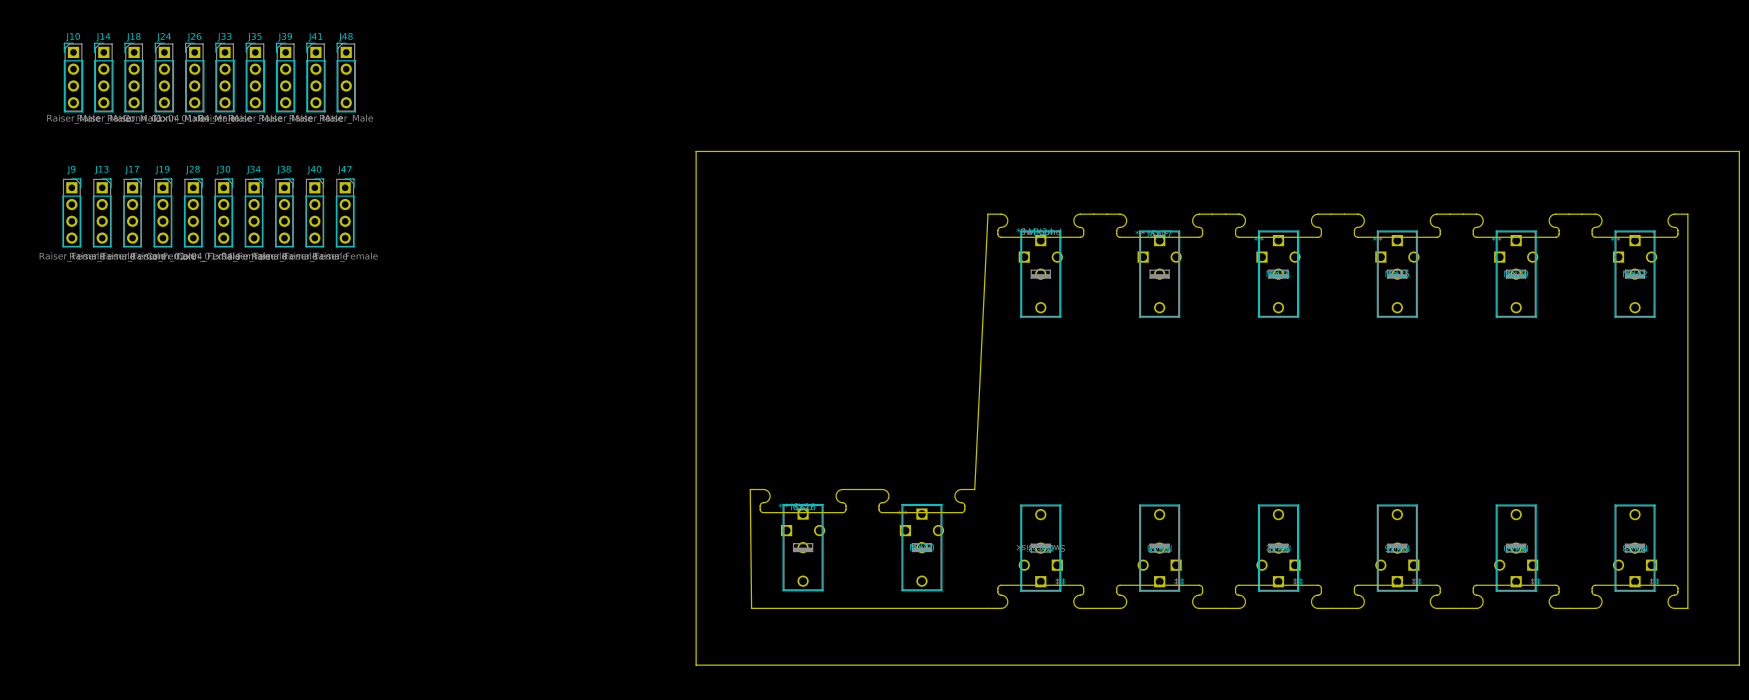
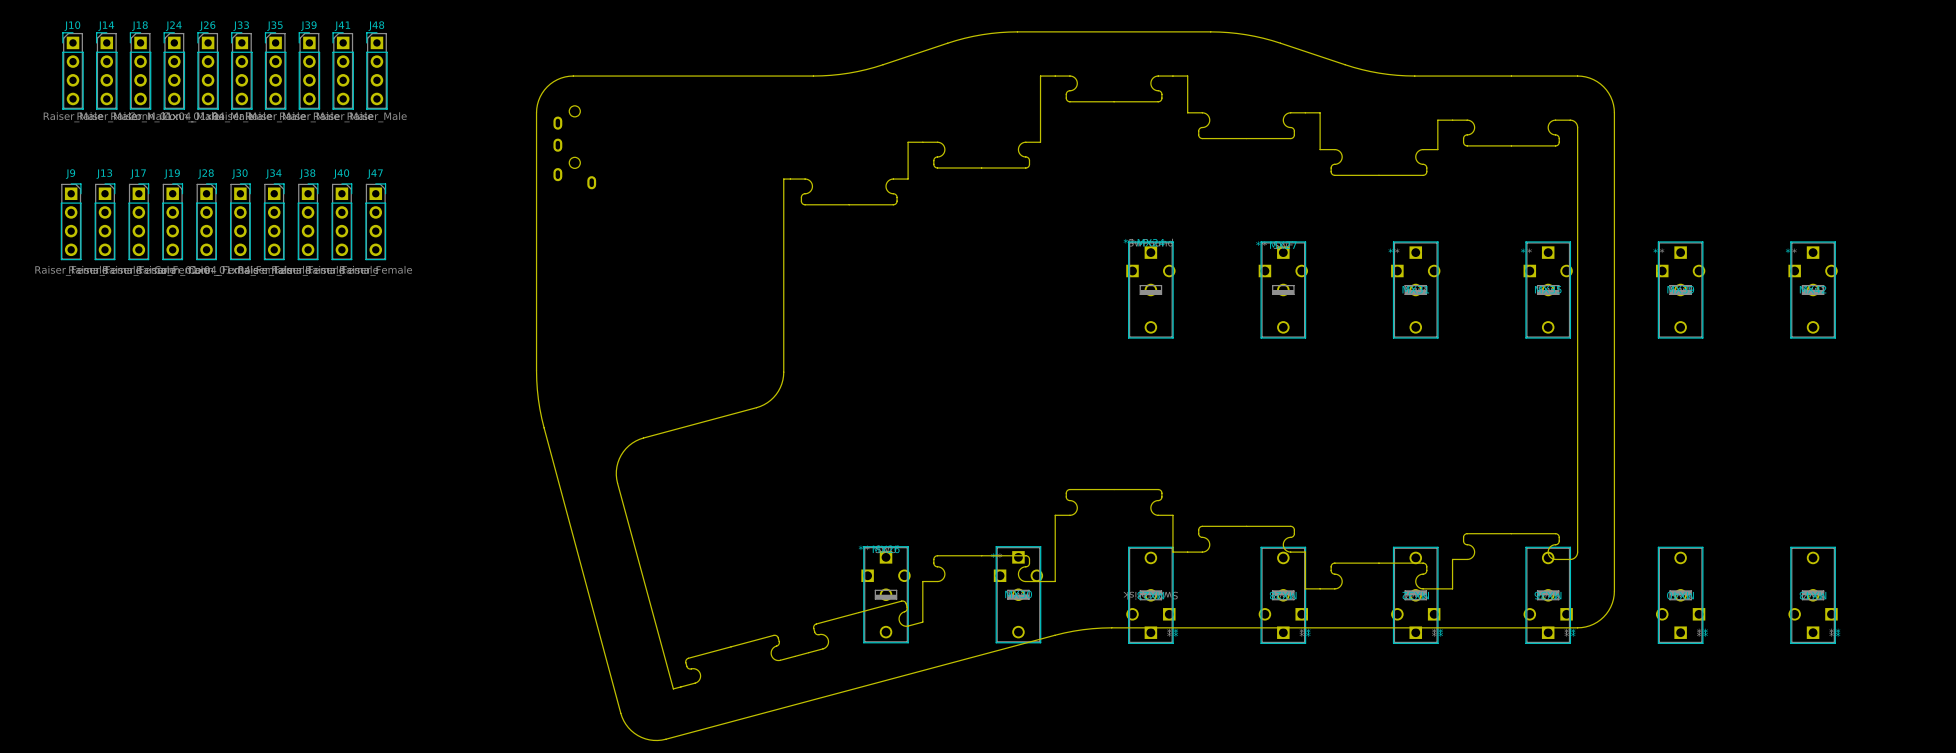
part: none -> (574, 147)
board edge: (696, 151) (1739, 151) (1739, 665) (696, 665) (696, 151) -> (1017, 31) (990, 33) (964, 38) (874, 67) (839, 74) (569, 76) (553, 81) (540, 96) (536, 112) (536, 370) (538, 399) (544, 427) (620, 713) (631, 730) (645, 738) (665, 739) (1054, 635) (1083, 629) (1111, 627) (1577, 627) (1593, 624) (1603, 617) (1612, 603) (1614, 591) (1614, 112) (1612, 100) (1603, 86) (1593, 79) (1581, 76) (1414, 76) (1379, 73) (1353, 67) (1272, 40) (1228, 32) (1017, 31)
board edge: (882, 512) (879, 510) (879, 504) (886, 501) (888, 496) (887, 491) (883, 489) (839, 490) (836, 496) (838, 501) (845, 504) (845, 510) (843, 512) (763, 512) (760, 510) (760, 505) (768, 499) (769, 493) (765, 489) (750, 489) (751, 608) (1001, 608) (1006, 606) (1007, 601) (1005, 596) (998, 593) (998, 587) (1001, 585) (1081, 585) (1083, 587) (1083, 593) (1076, 596) (1073, 601) (1076, 606) (1080, 608) (1123, 607) (1126, 604) (1126, 599) (1116, 592) (1116, 587) (1120, 585) (1200, 585) (1202, 587) (1202, 593) (1194, 596) (1192, 601) (1194, 606) (1199, 608) (1241, 607) (1245, 600) (1243, 596) (1235, 593) (1235, 587) (1238, 585) (1318, 585) (1321, 587) (1321, 593) (1313, 597) (1311, 601) (1313, 606) (1318, 608) (1361, 607) (1363, 604) (1363, 599) (1354, 592) (1354, 587) (1357, 585) (1437, 585) (1440, 587) (1440, 593) (1432, 597) (1430, 601) (1432, 606) (1436, 608) (1479, 607) (1483, 600) (1480, 596) (1473, 593) (1473, 587) (1476, 585) (1556, 585) (1558, 587) (1558, 593) (1551, 596) (1549, 600) (1552, 607) (1595, 608) (1600, 606) (1602, 601) (1600, 597) (1592, 593) (1592, 587) (1594, 585) (1674, 585) (1677, 587) (1677, 592) (1669, 598) (1668, 604) (1673, 608) (1687, 608) (1687, 214) (1673, 214) (1668, 217) (1669, 224) (1677, 229) (1677, 235) (1674, 237) (1594, 237) (1592, 234) (1592, 229) (1600, 225) (1602, 220) (1600, 216) (1595, 214) (1552, 215) (1549, 219) (1549, 223) (1559, 230) (1558, 235) (1555, 237) (1475, 237) (1473, 234) (1473, 229) (1481, 225) (1483, 220) (1481, 216) (1476, 214) (1433, 215) (1430, 219) (1430, 223) (1440, 230) (1440, 235) (1436, 237) (1356, 237) (1354, 234) (1354, 229) (1362, 225) (1364, 220) (1362, 216) (1357, 214) (1314, 215) (1311, 219) (1312, 223) (1321, 230) (1321, 235) (1318, 237) (1238, 237) (1235, 234) (1235, 229) (1243, 225) (1245, 220) (1243, 216) (1238, 214) (1195, 215) (1192, 221) (1195, 226) (1202, 229) (1202, 234) (1199, 237) (1119, 237) (1116, 234) (1116, 229) (1124, 226) (1126, 221) (1123, 215) (1080, 214) (1075, 216) (1073, 220) (1075, 225) (1083, 229) (1083, 234) (1081, 237) (1001, 237) (998, 235) (997, 229) (1006, 224) (1006, 217) (1002, 214) (987, 214) (974, 489) (960, 489) (955, 492) (956, 500) (964, 504) (963, 512) (928, 512) -> (974, 555) (934, 557) (934, 564) (943, 569) (944, 575) (939, 581) (922, 581) (922, 622) (907, 626) (901, 624) (899, 616) (907, 608) (905, 602) (901, 601) (815, 624) (813, 627) (815, 633) (824, 635) (828, 639) (827, 645) (823, 648) (776, 660) (771, 654) (772, 649) (779, 643) (777, 637) (774, 635) (688, 658) (685, 661) (687, 667) (698, 670) (700, 678) (696, 682) (673, 688) (617, 483) (616, 466) (623, 451) (635, 441) (760, 406) (770, 400) (778, 391) (783, 372) (783, 179) (806, 179) (810, 181) (811, 190) (801, 196) (801, 202) (804, 204) (894, 204) (896, 202) (896, 196) (888, 191) (886, 184) (891, 179) (908, 179) (908, 142) (937, 142) (942, 144) (944, 148) (943, 153) (933, 159) (933, 165) (936, 167) (1027, 167) (1029, 165) (1029, 159) (1020, 154) (1018, 148) (1023, 142) (1040, 142) (1040, 76) (1074, 77) (1077, 82) (1076, 87) (1066, 93) (1066, 99) (1069, 101) (1159, 101) (1161, 99) (1161, 93) (1151, 87) (1150, 82) (1153, 78) (1158, 76) (1187, 76) (1187, 112) (1204, 113) (1209, 118) (1207, 125) (1198, 129) (1198, 135) (1201, 138) (1291, 138) (1294, 135) (1294, 130) (1284, 123) (1283, 119) (1285, 114) (1290, 112) (1320, 112) (1320, 149) (1336, 149) (1341, 155) (1340, 162) (1331, 166) (1331, 172) (1334, 175) (1424, 174) (1426, 166) (1417, 162) (1416, 155) (1421, 149) (1437, 149) (1437, 120) (1471, 121) (1474, 126) (1473, 131) (1463, 138) (1463, 143) (1467, 145) (1556, 145) (1559, 143) (1559, 137) (1549, 131) (1549, 123) (1555, 120) (1571, 120) (1576, 122) (1577, 127) (1577, 552) (1574, 557) (1555, 559) (1549, 556) (1549, 548) (1559, 542) (1559, 536) (1556, 533) (1466, 533) (1463, 536) (1463, 542) (1472, 547) (1474, 553) (1469, 559) (1452, 559) (1452, 588) (1418, 587) (1415, 582) (1416, 577) (1426, 570) (1426, 565) (1423, 563) (1333, 563) (1331, 565) (1331, 571) (1341, 577) (1342, 582) (1340, 586) (1334, 588) (1305, 588) (1305, 552) (1288, 551) (1283, 546) (1285, 539) (1294, 535) (1292, 527) (1201, 526) (1198, 529) (1198, 534) (1208, 541) (1209, 545) (1207, 550) (1202, 552) (1172, 552) (1172, 515) (1156, 515) (1151, 509) (1153, 502) (1161, 498) (1161, 491) (1158, 489) (1068, 490) (1066, 498) (1074, 502) (1077, 508) (1071, 515) (1055, 515) (1055, 581) (1025, 581) (1020, 579) (1018, 575) (1019, 570) (1029, 564) (1029, 558) (1025, 555)

